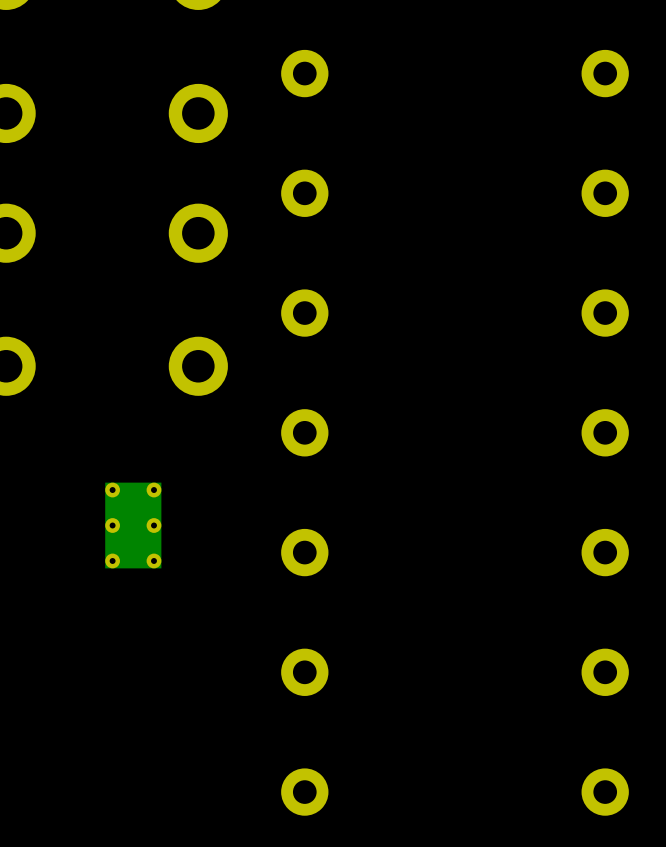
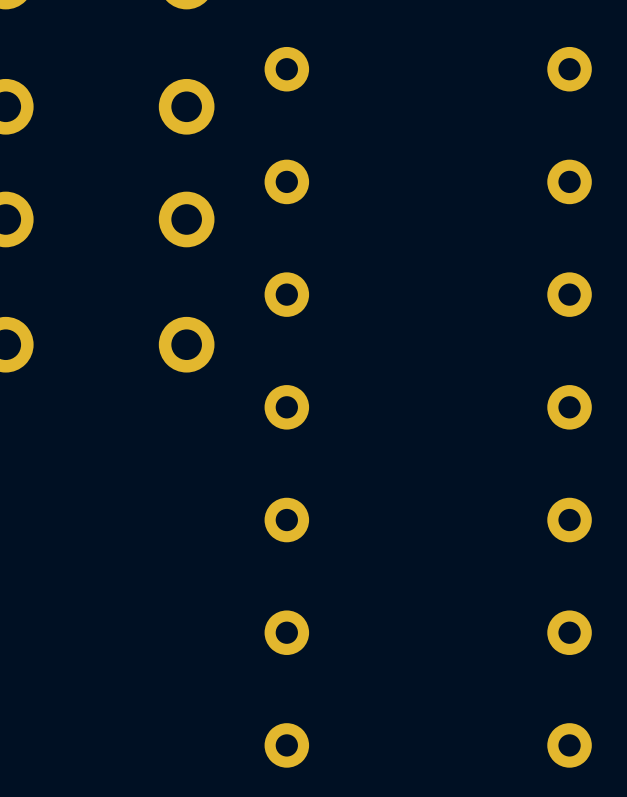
part: (133, 525) -> none

